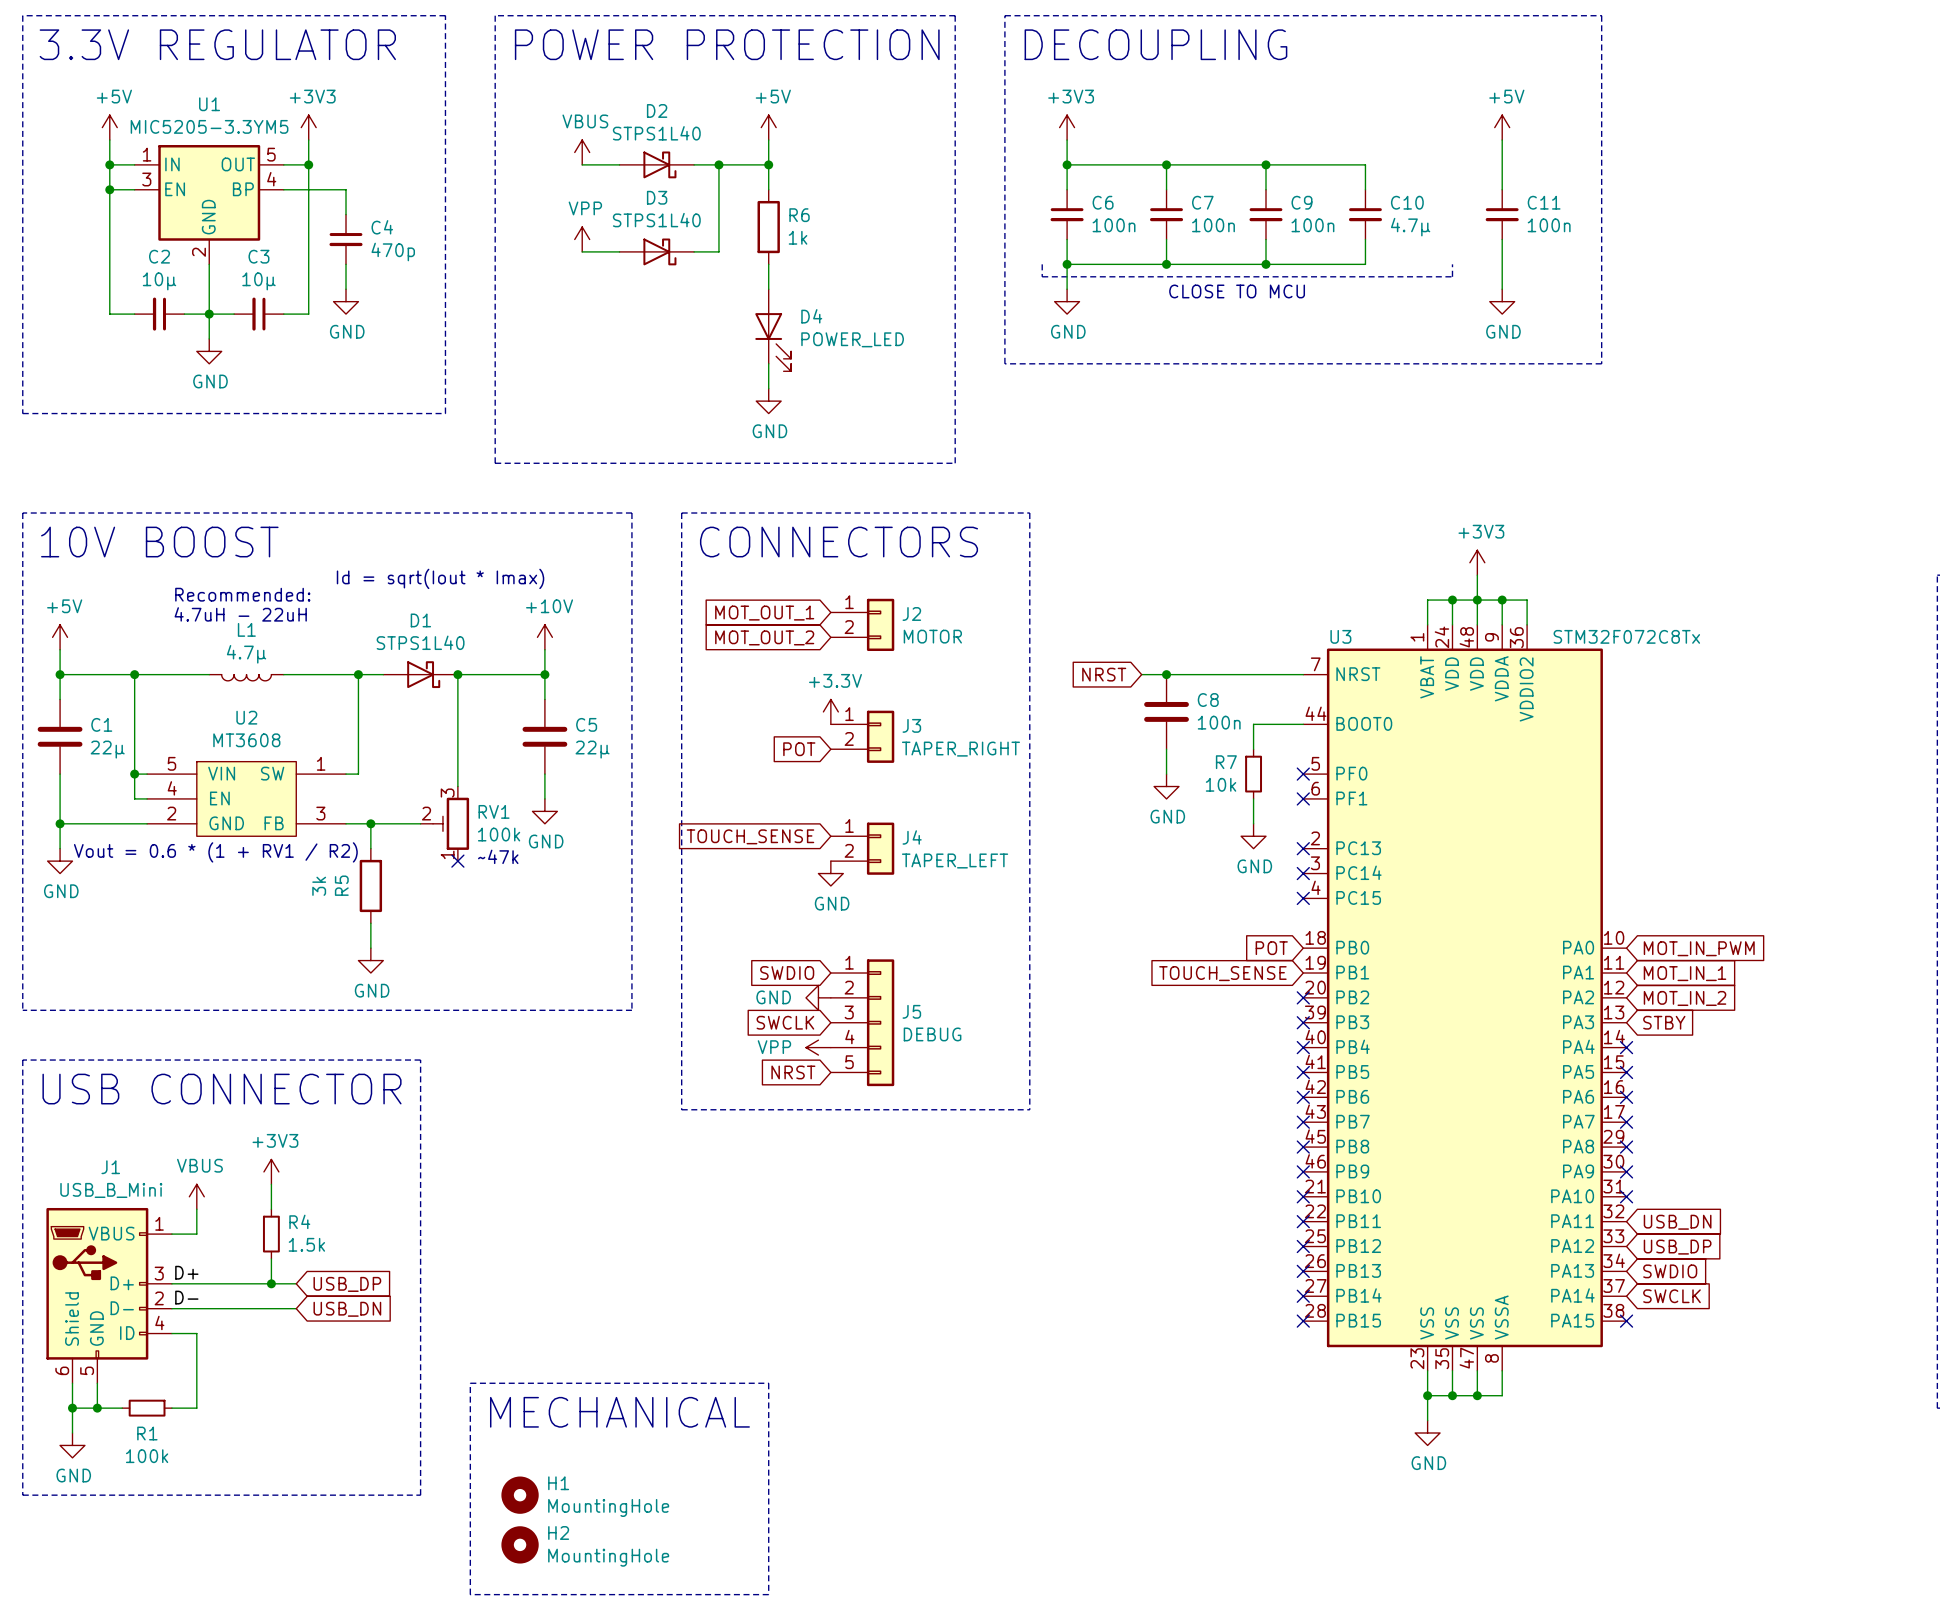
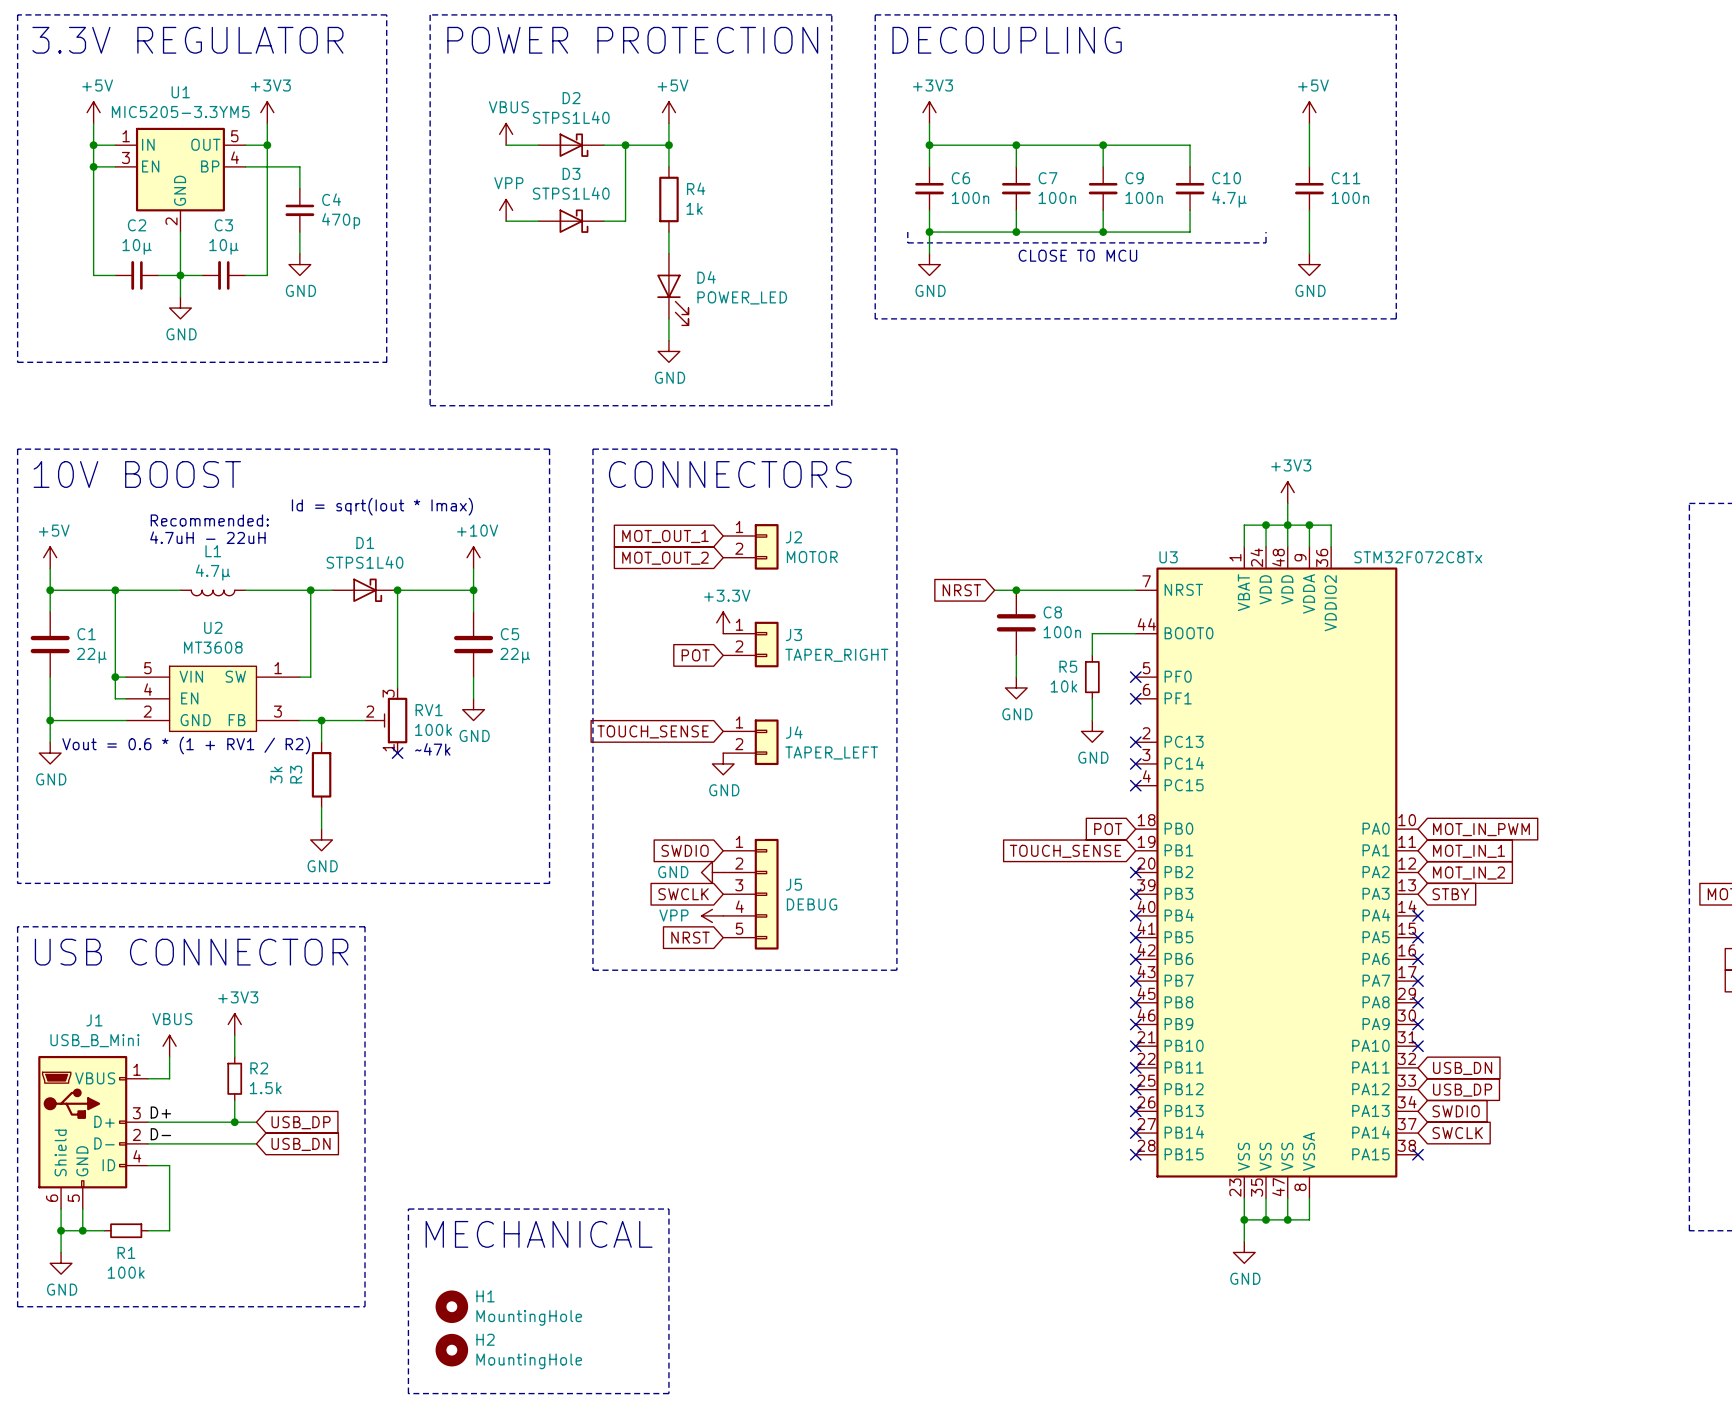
R6 name: R6 (799, 215) -> R4 (696, 188)
R7 name: R7 (1226, 762) -> R5 (1068, 666)
R5 name: R5 (341, 885) -> R3 (296, 774)
R4 name: R4 (299, 1221) -> R2 (259, 1068)

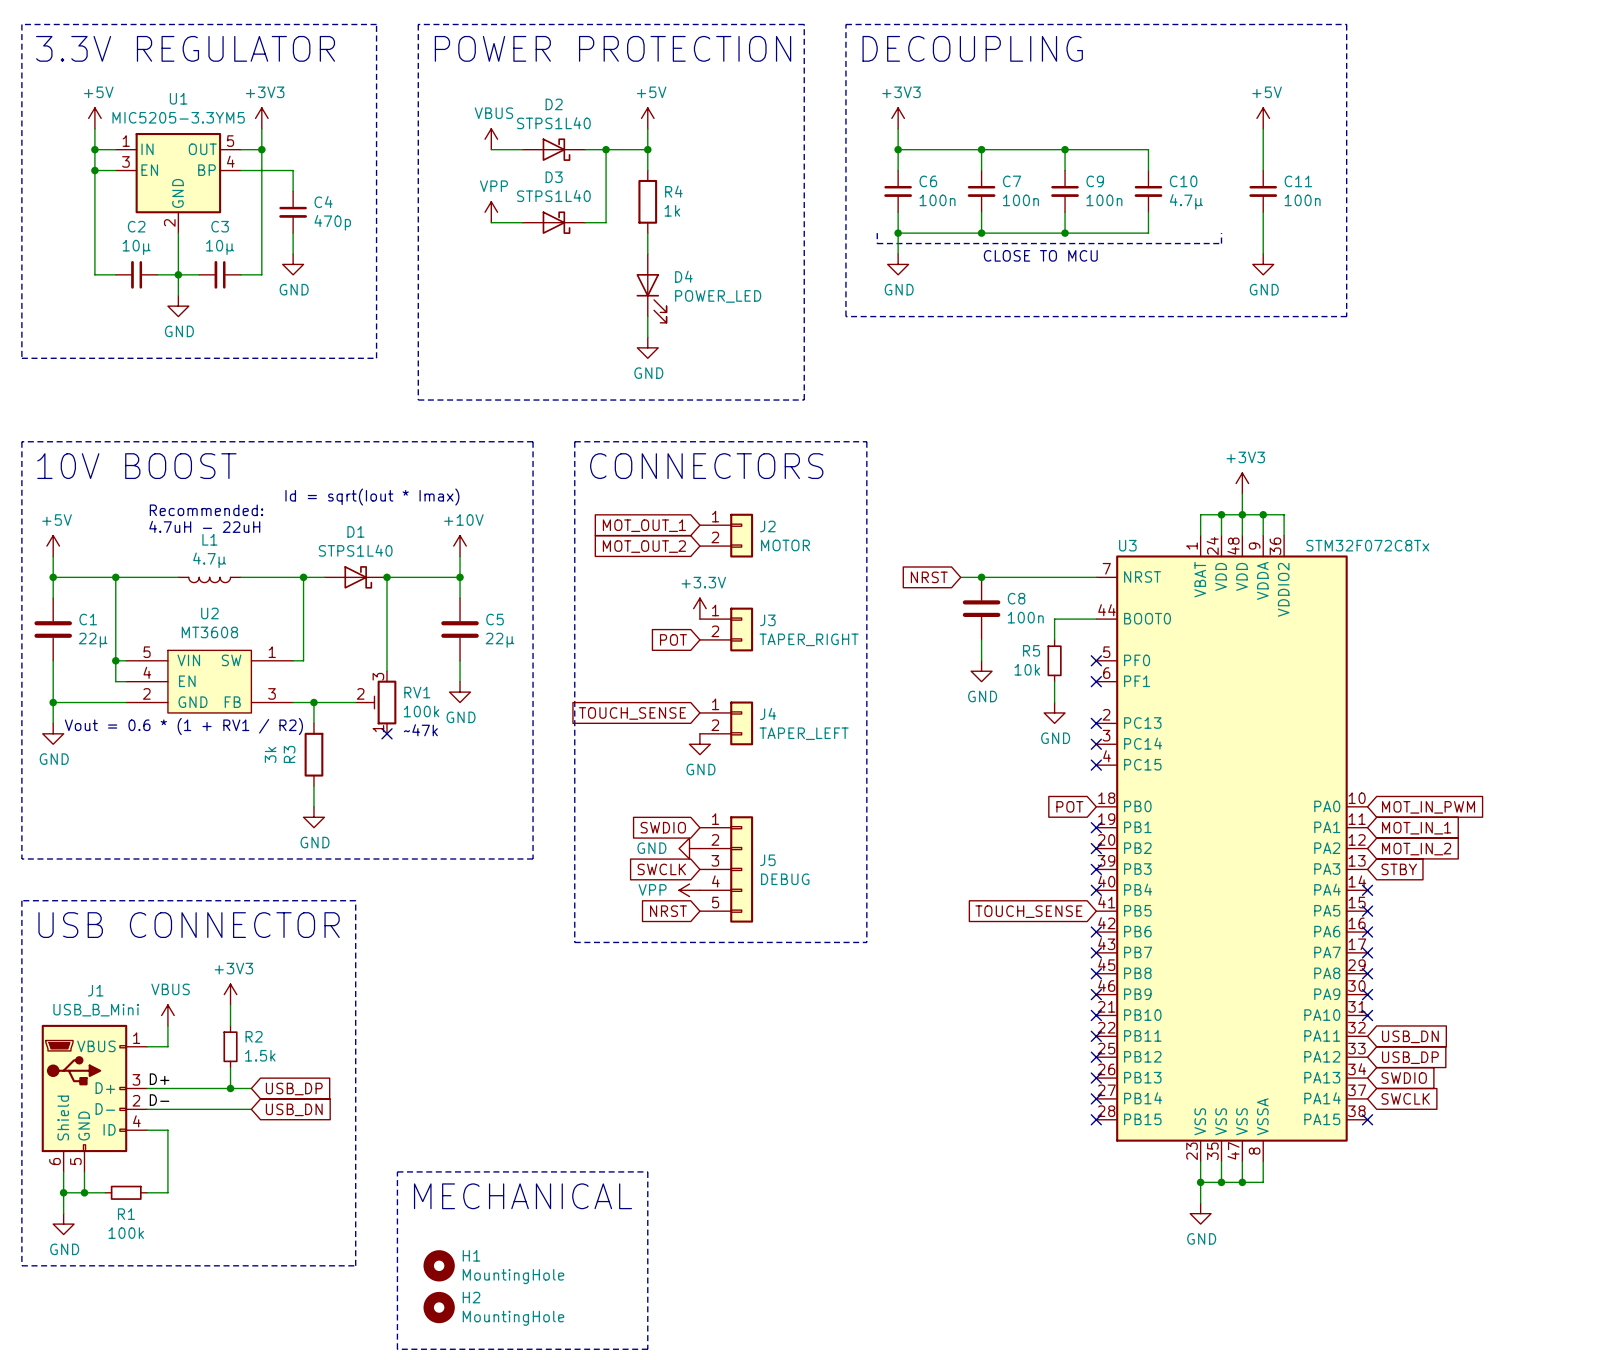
no-connect mark: none -> (1096, 827)
global label position: TOUCH_SENSE (1065, 851) -> TOUCH_SENSE (1028, 911)
no-connect mark: (1135, 937) -> none

